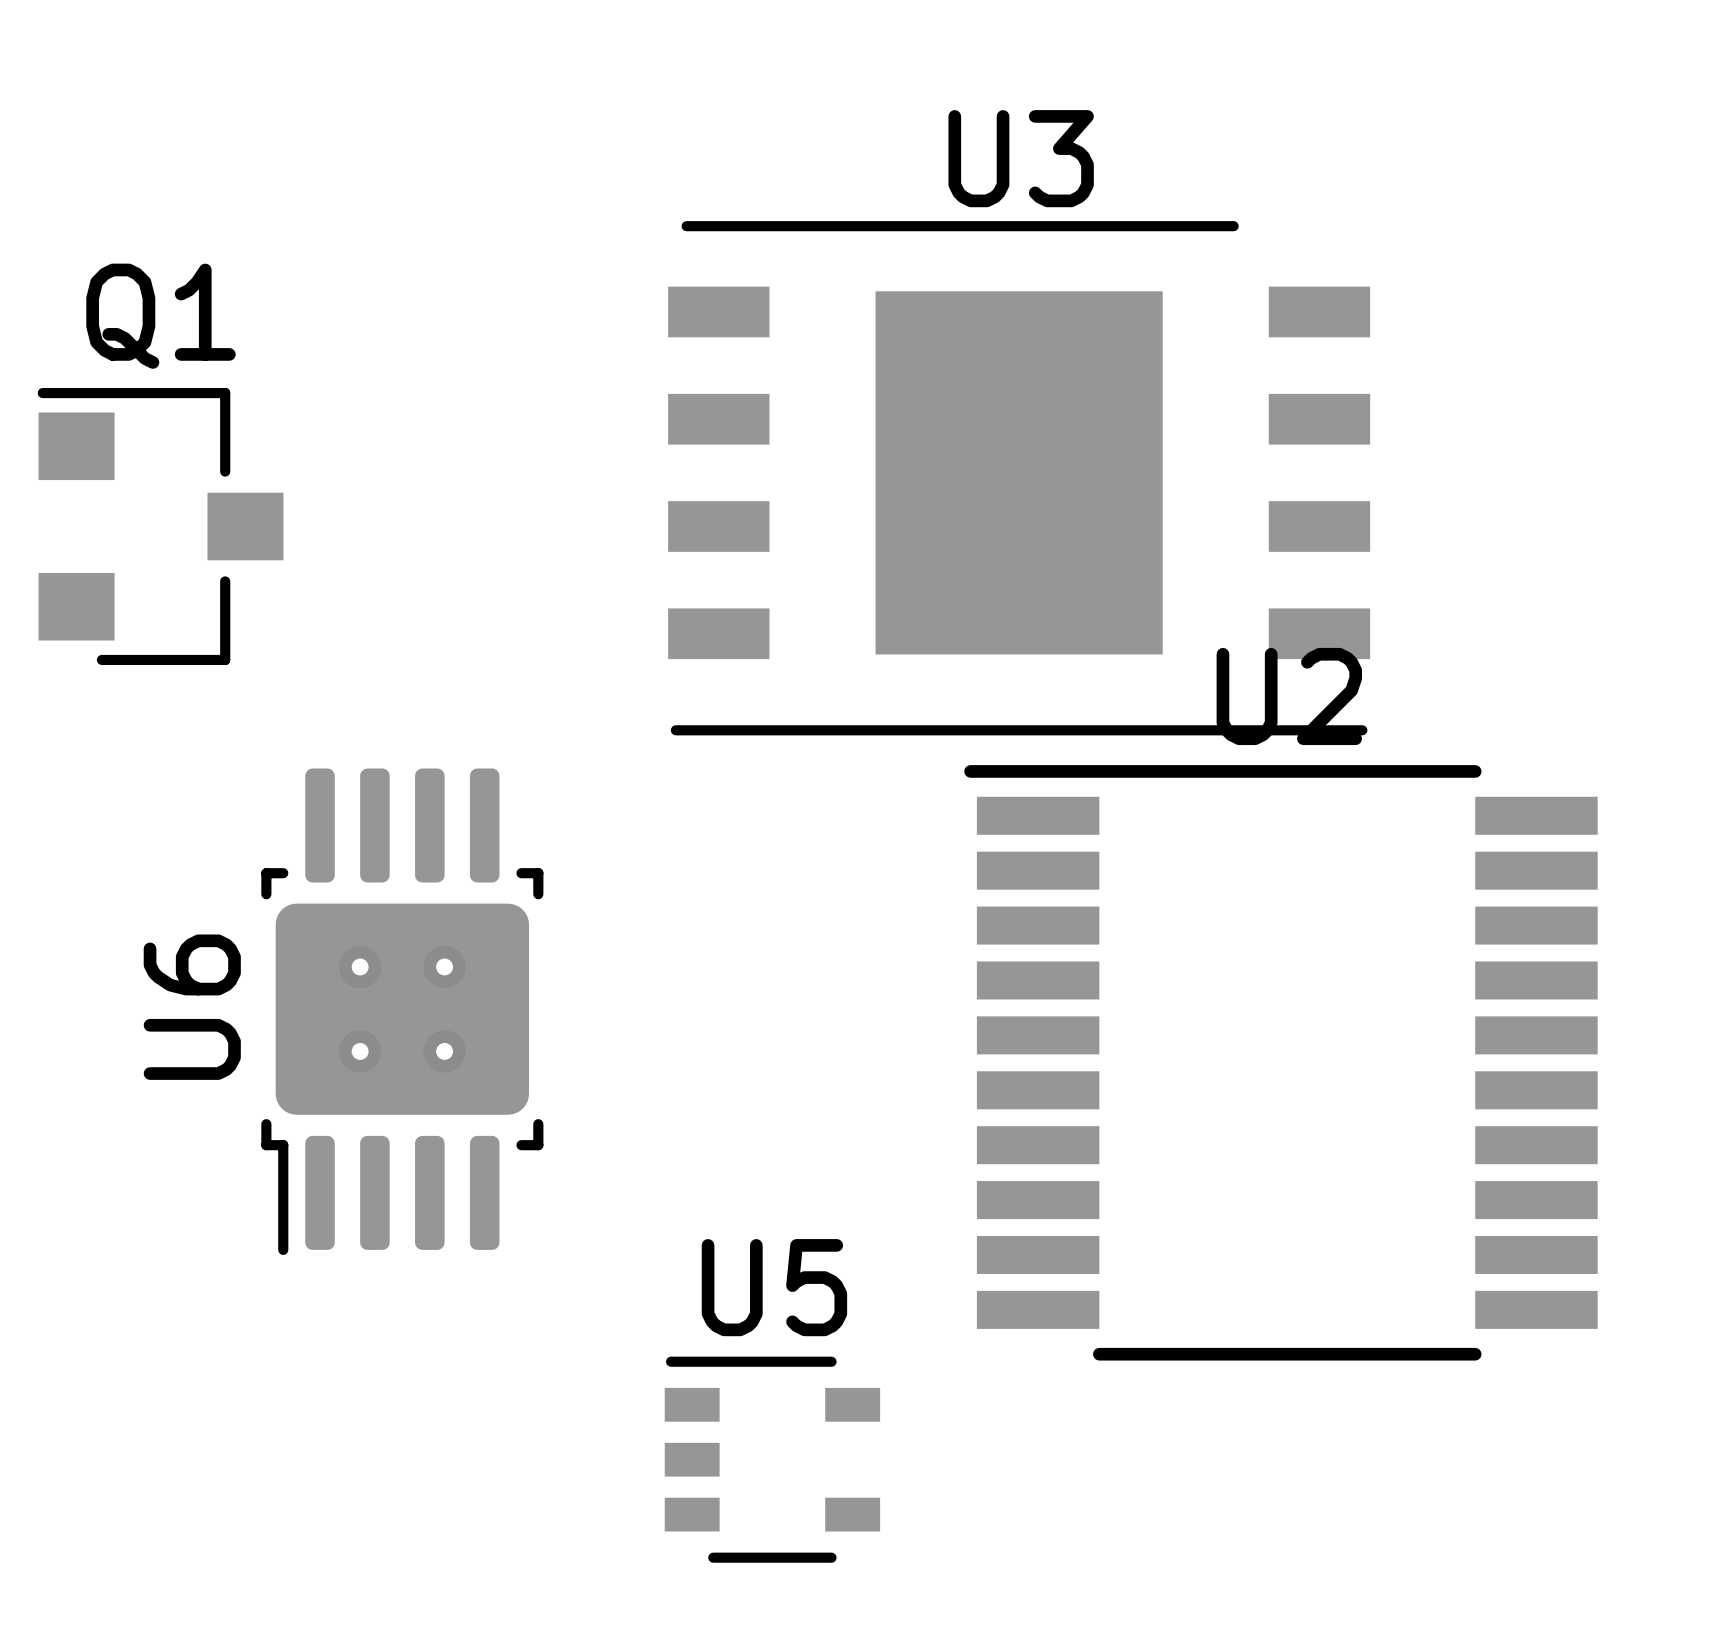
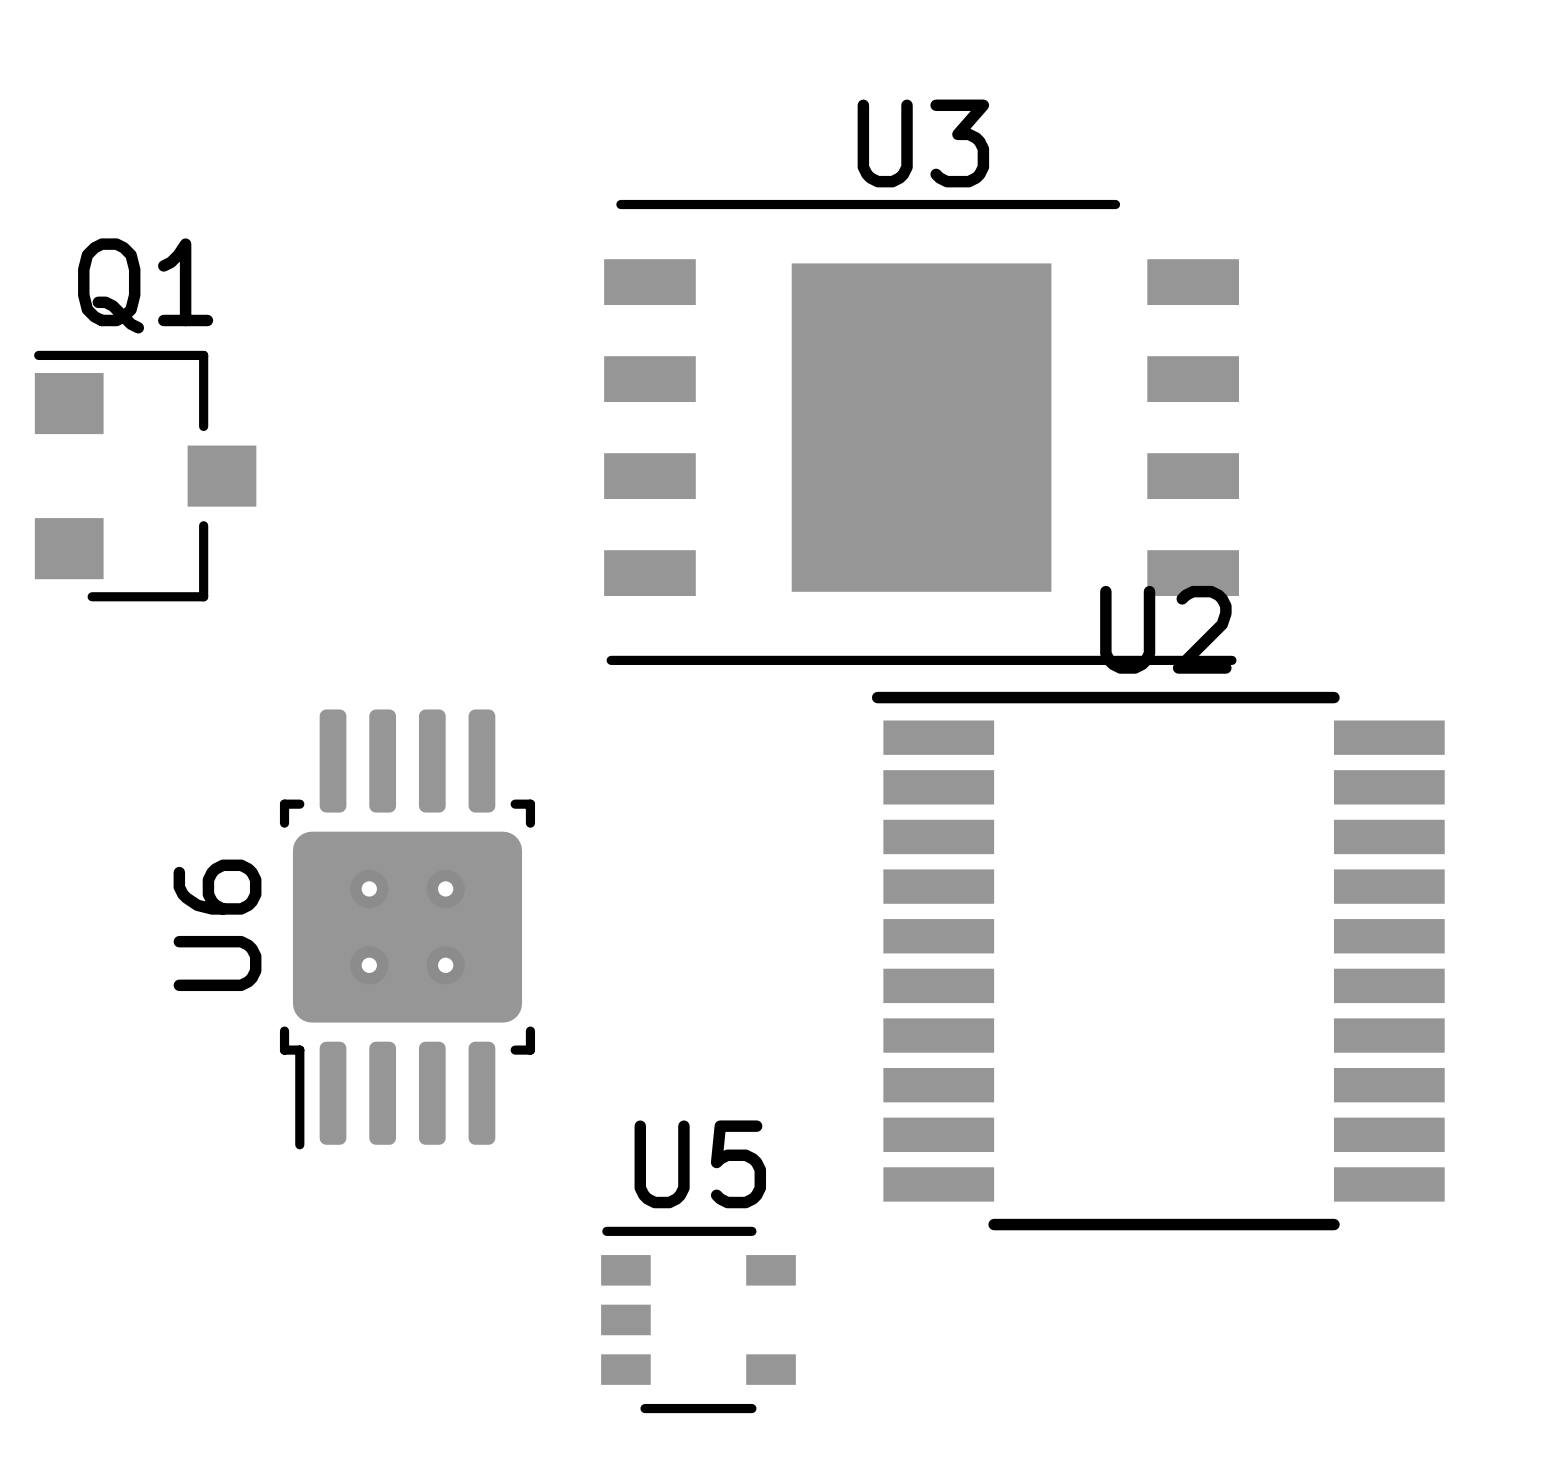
U6 position: (402, 1011) -> (407, 929)

